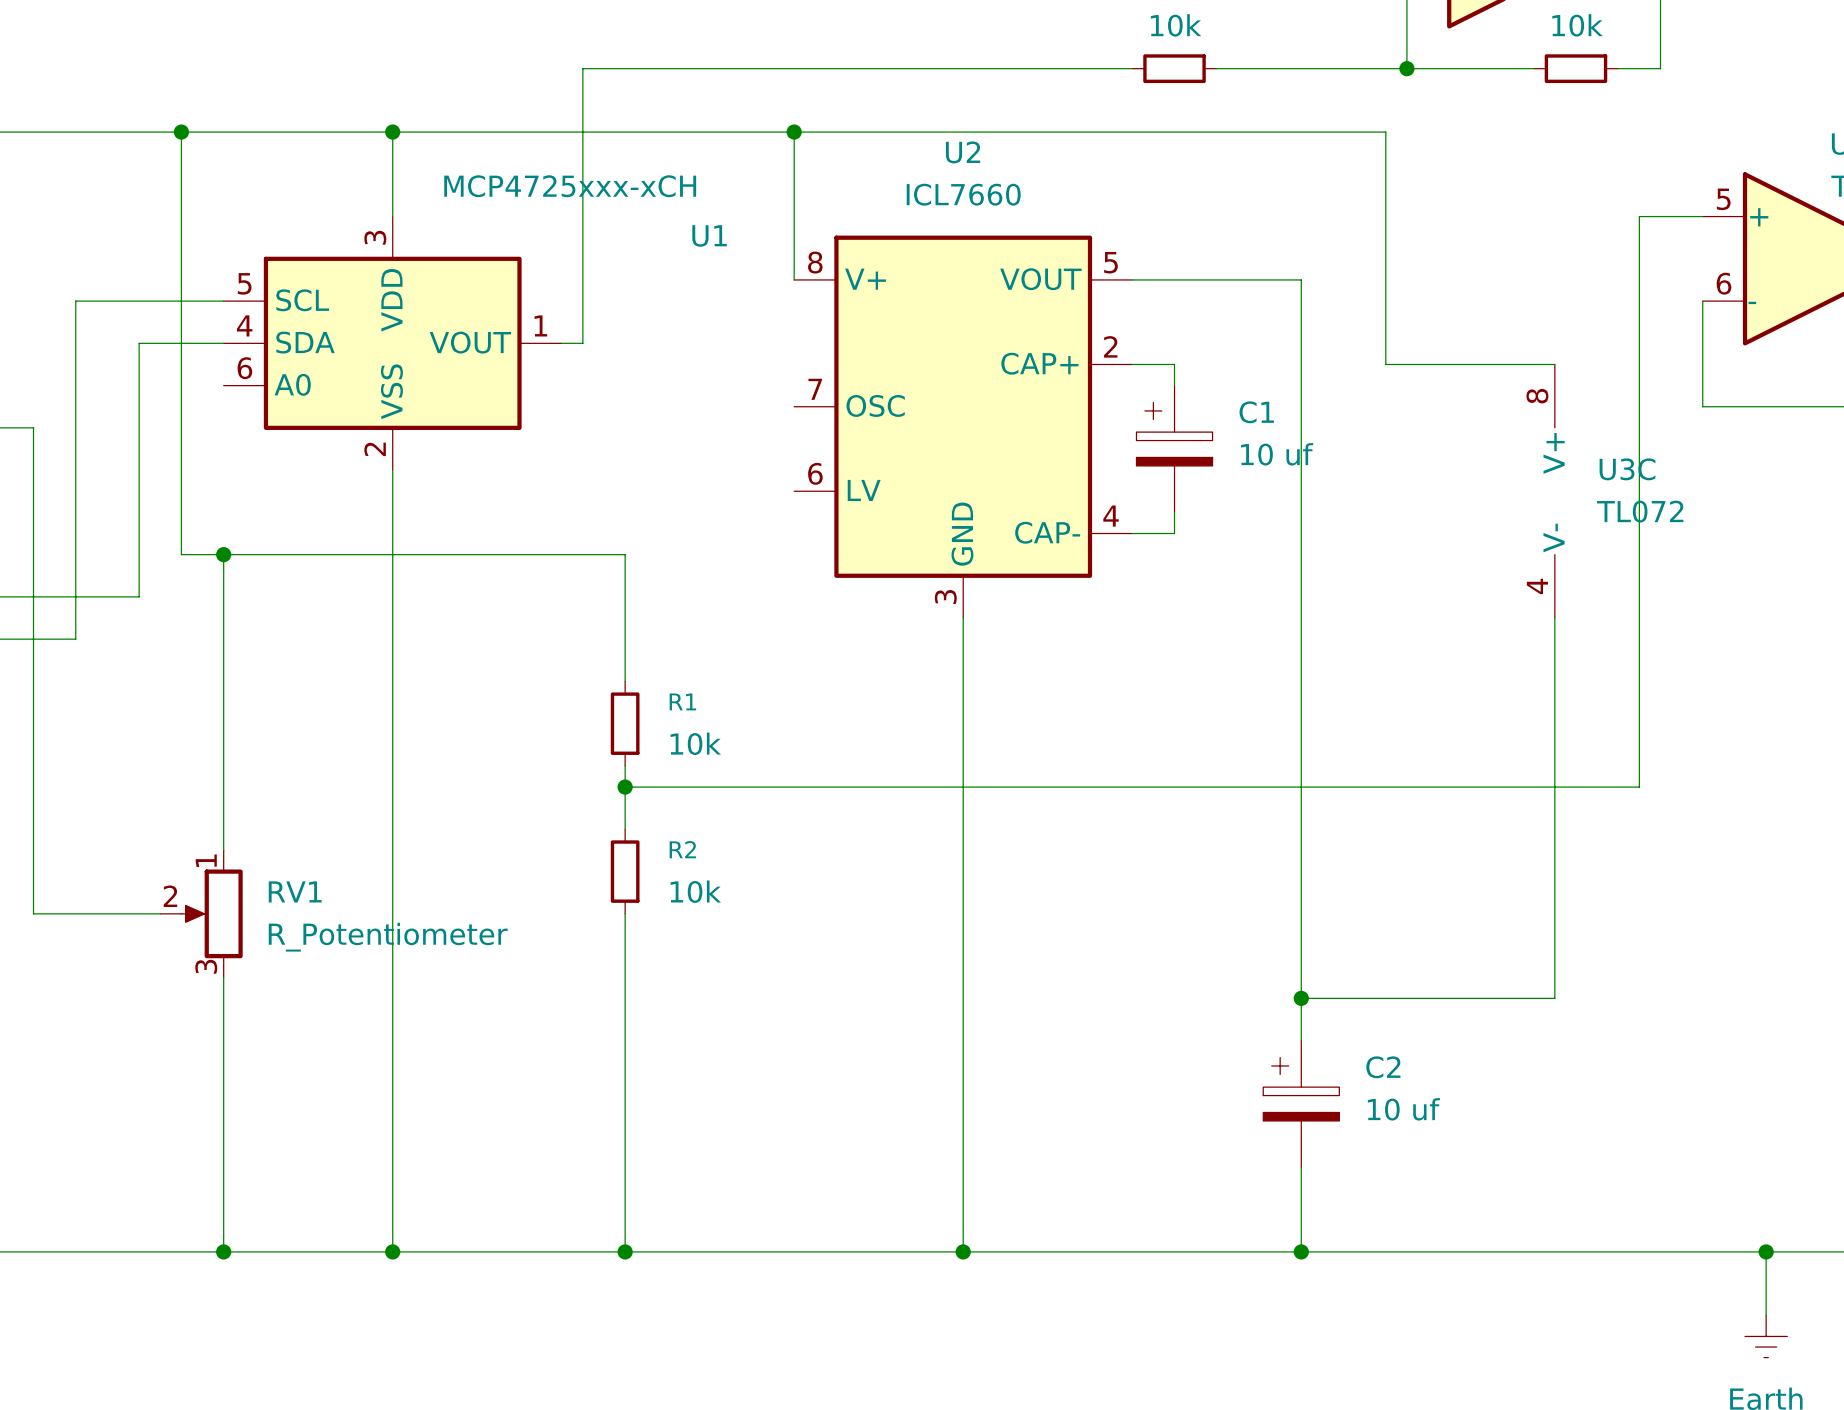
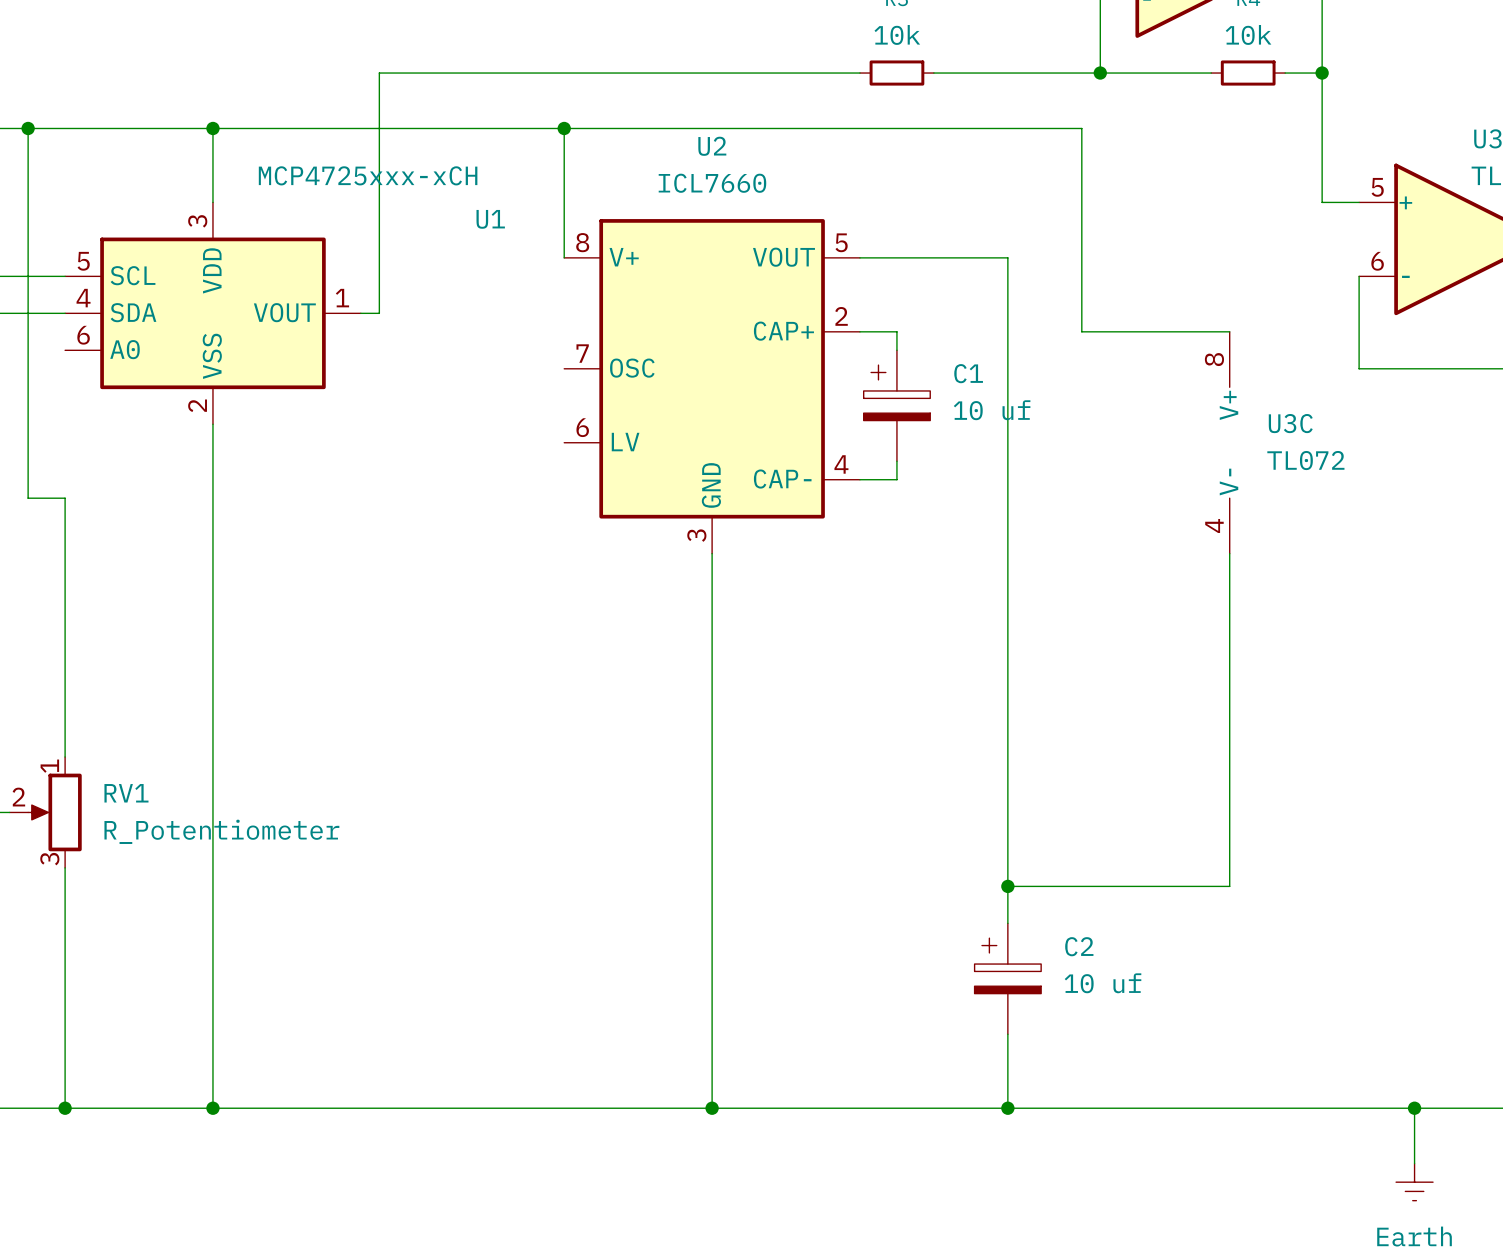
junction: none -> (1322, 73)
wire: (1660, 216) (1639, 216) (1639, 787) (625, 787) -> (1322, 202) (1322, 73)
wire: (223, 554) (625, 554) (625, 681) -> none
junction: (223, 554) -> none
R1: 10k (625, 723) -> none
wire: (625, 765) (625, 829) -> none
junction: (625, 787) -> none
R2: 10k (625, 871) -> none
wire: (625, 913) (625, 1251) -> none
junction: (625, 1251) -> none

